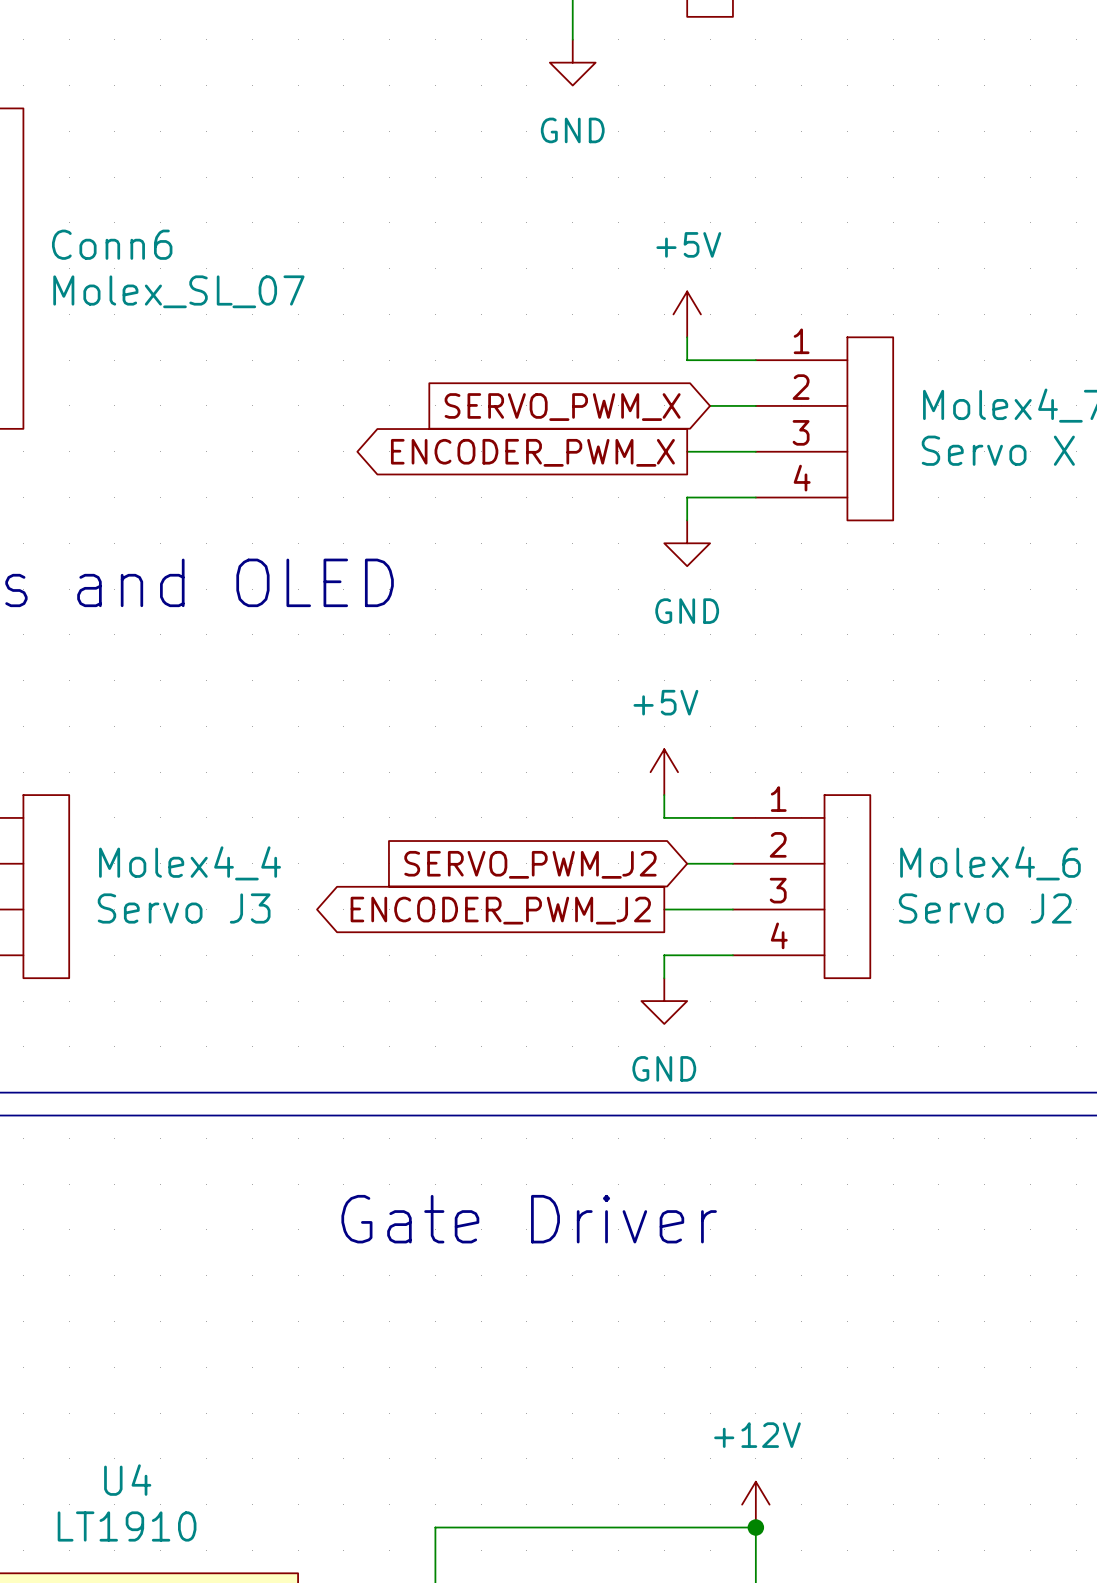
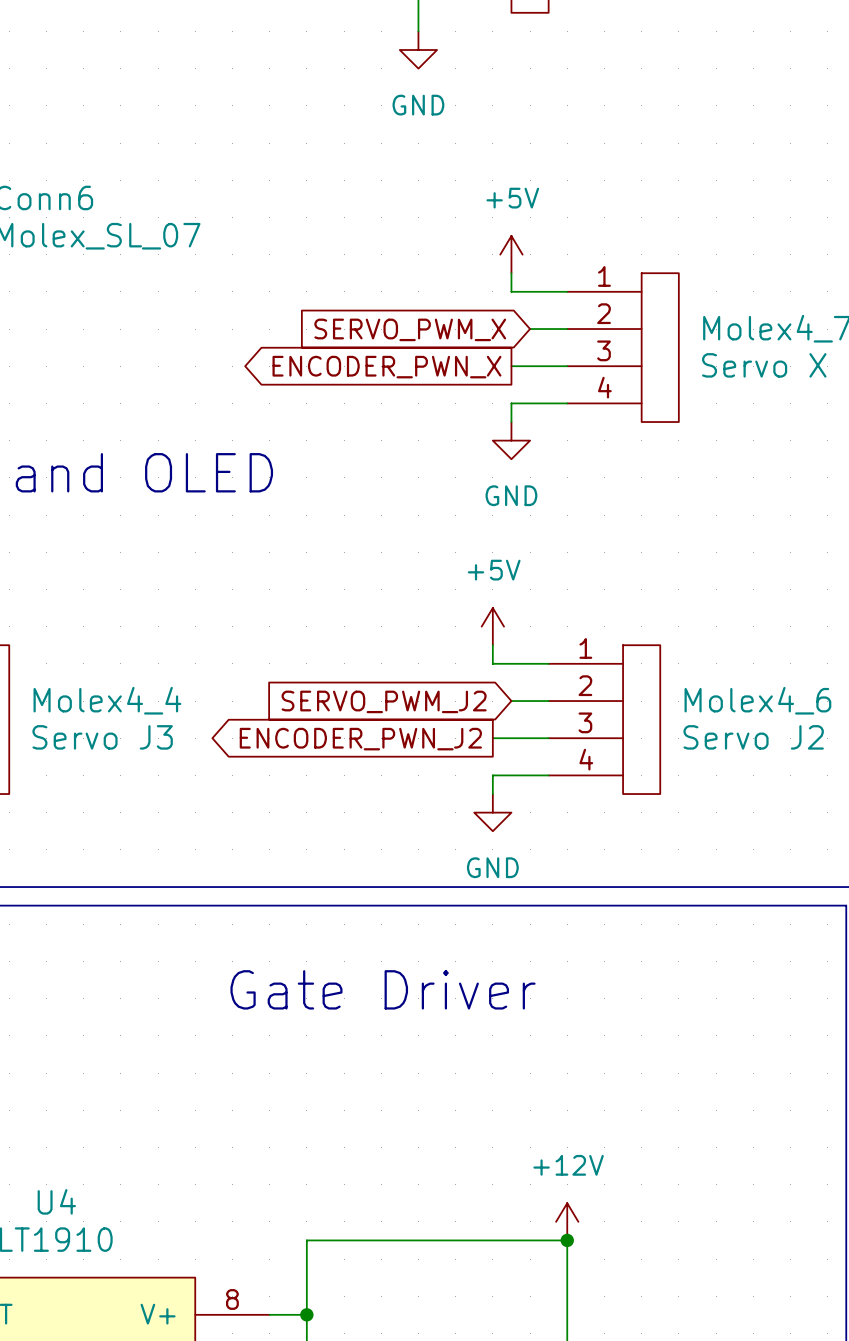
global label: ENCODER_PWM_X (532, 452) -> ENCODER_PWN_X (386, 367)
global label: ENCODER_PWM_J2 (500, 910) -> ENCODER_PWN_J2 (360, 739)

